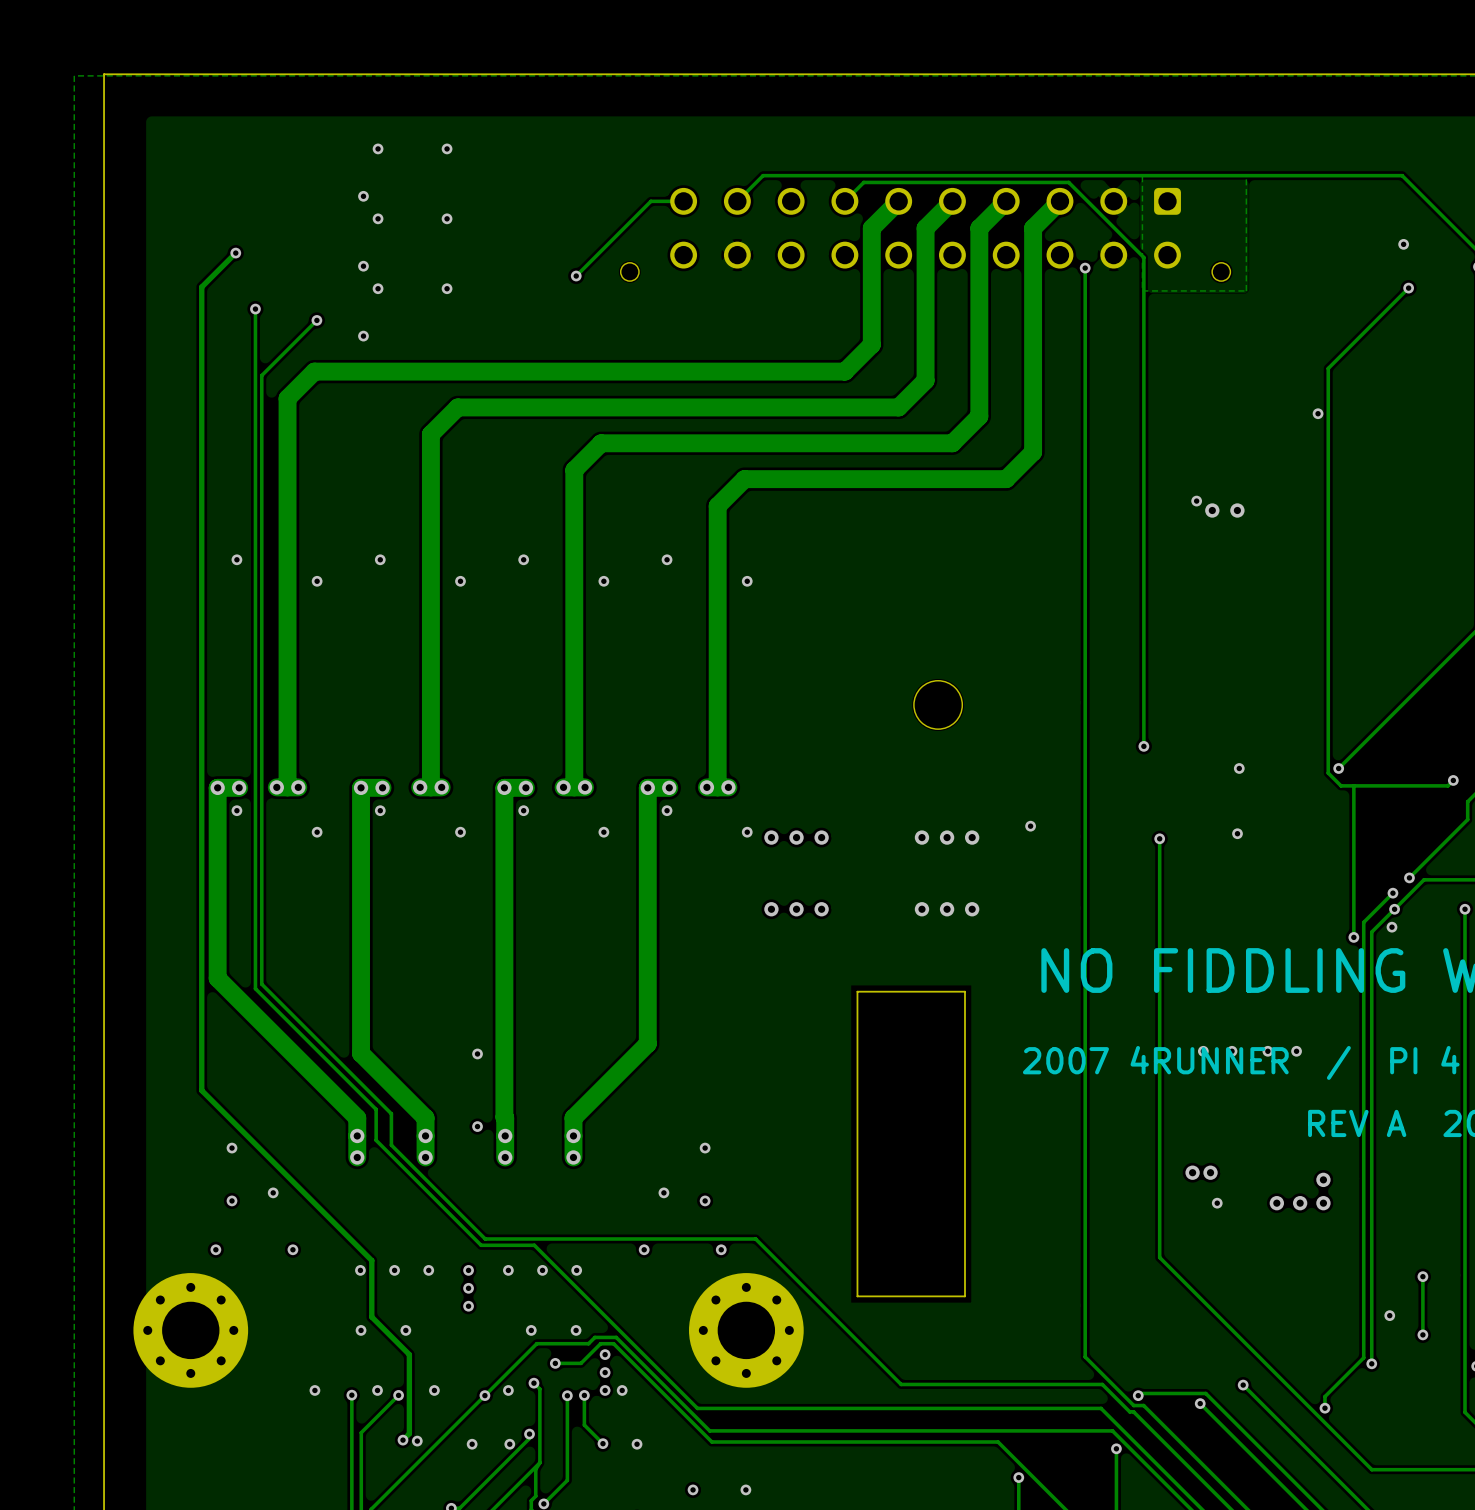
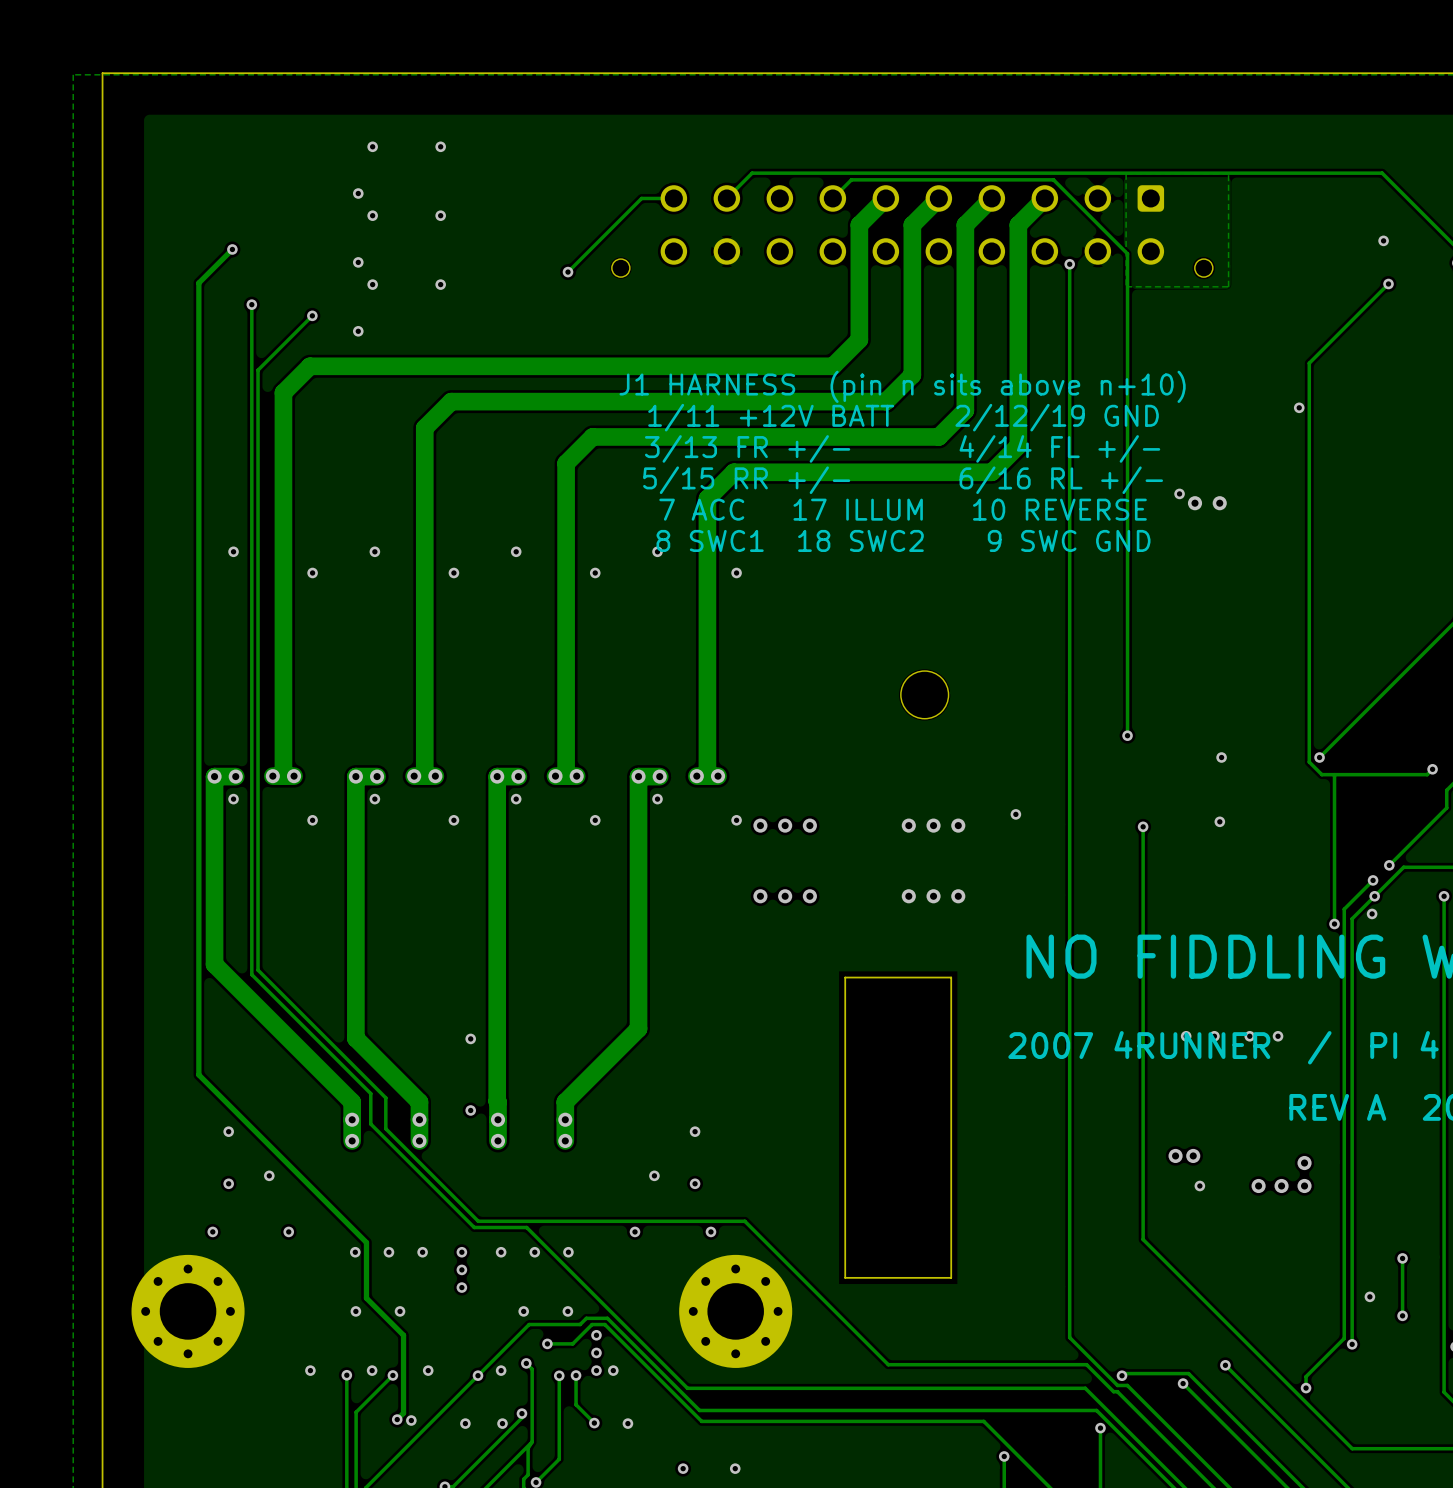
text: none -> J1 HARNESS (pin n sits above n+10) (902, 386)
text: none -> 1/11 +12V BATT 2/12/19 GND (903, 417)
text: none -> 3/13 FR +/- 4/14 FL +/- (902, 448)
text: none -> 5/15 RR +/- 6/16 RL +/- (903, 480)
text: none -> 7 ACC 17 ILLUM 10 REVERSE (903, 509)
text: none -> 8 SWC1 18 SWC2 9 SWC GND (903, 540)

